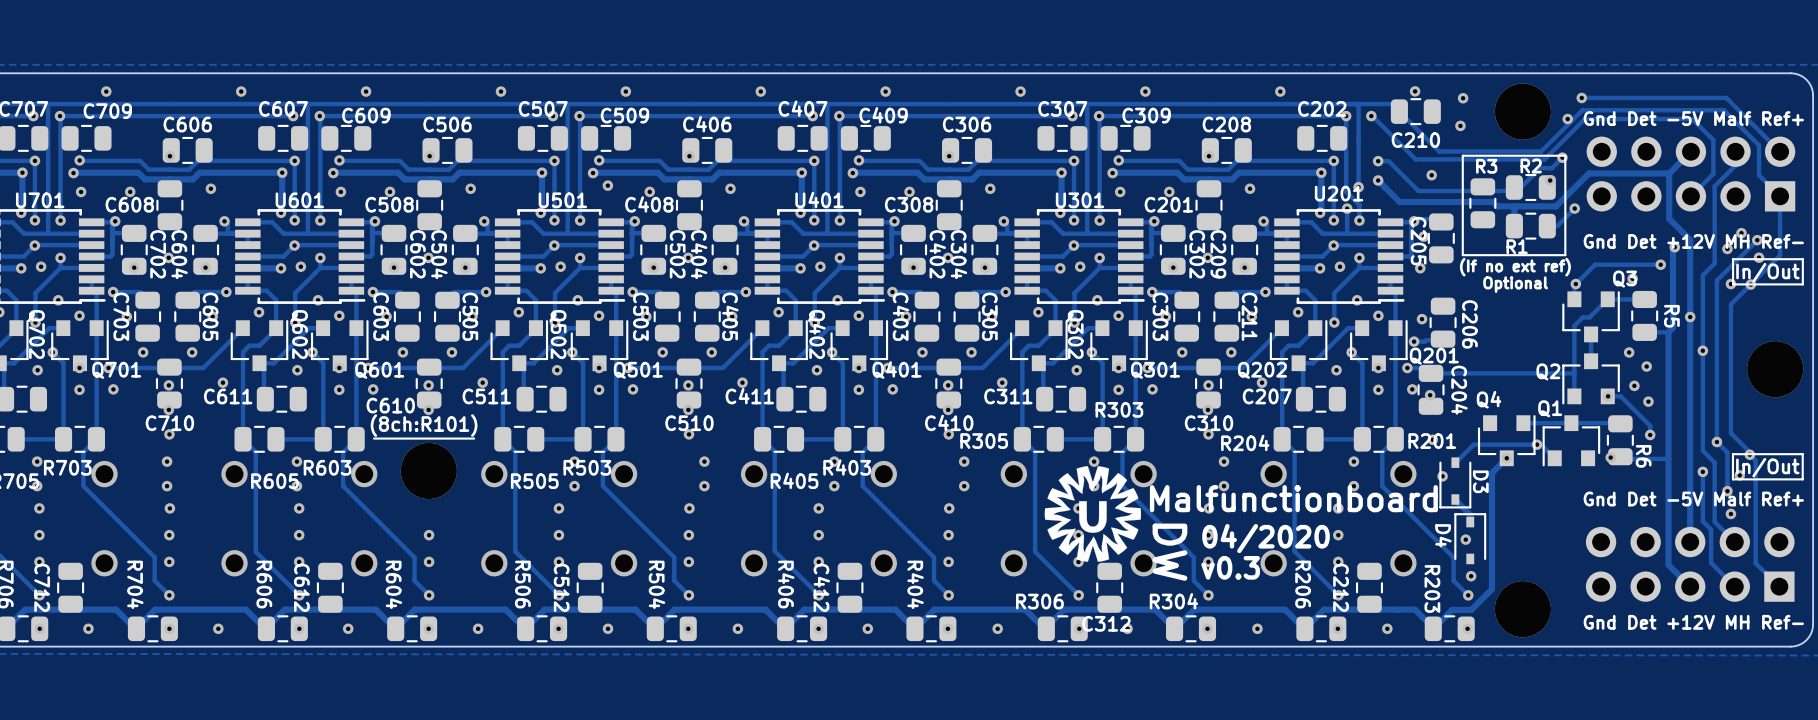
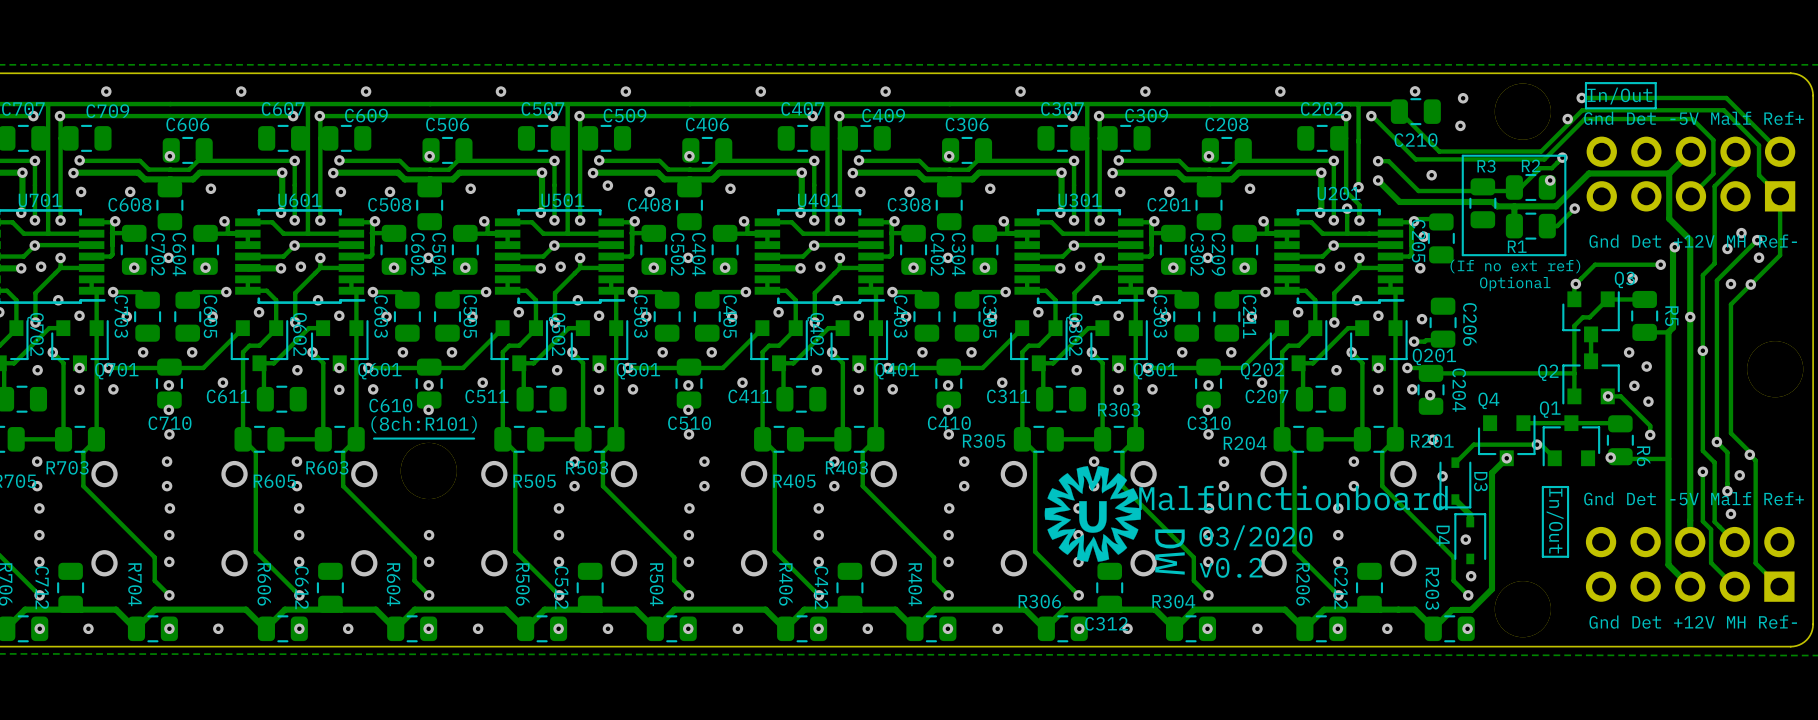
text: none -> In/Out (1619, 96)
line: (1802, 259) (1733, 259) (1733, 284) (1802, 284) (1802, 259) -> (1655, 83) (1585, 83) (1585, 108) (1655, 108) (1655, 83)
text: In/Out (1767, 272) -> none
line: (1802, 454) (1802, 479) (1732, 479) (1732, 454) (1802, 454) -> none
text: In/Out (1767, 467) -> none
line: none -> (1568, 487) (1568, 556) (1542, 556) (1542, 487) (1568, 487)
text: none -> In/Out (1555, 520)
text: 04/2020 (1266, 538) -> 03/2020 (1255, 537)
text: v0.3 (1230, 567) -> v0.2 (1231, 567)

